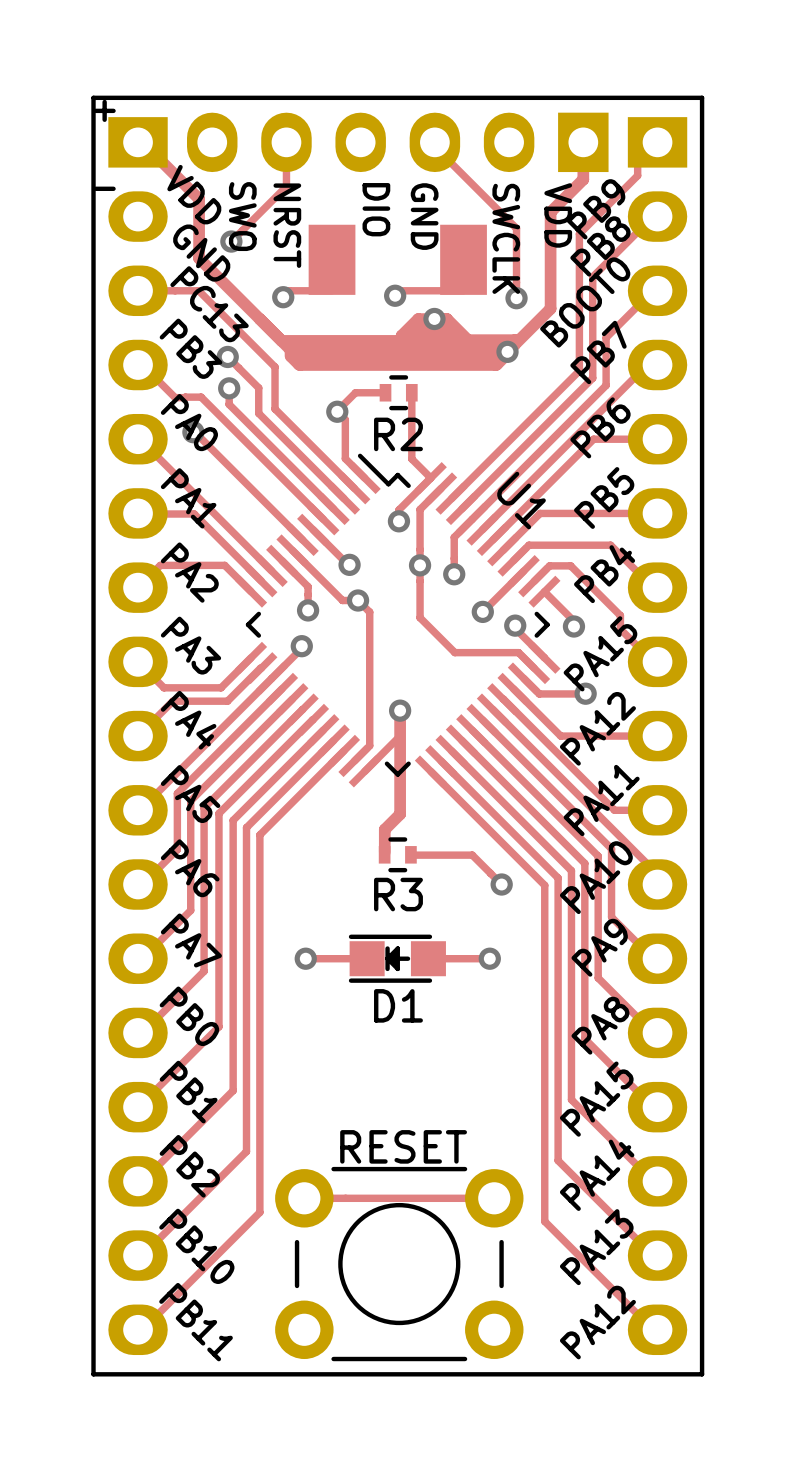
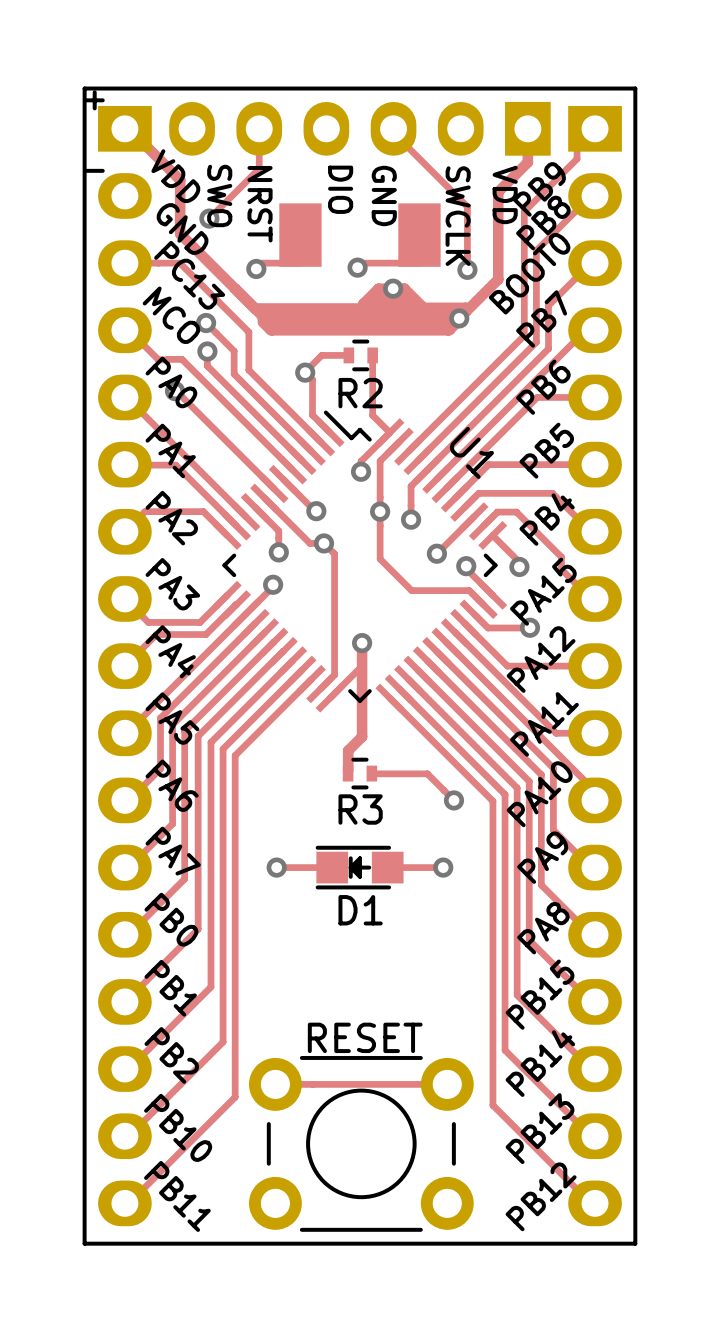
text: PB3 (190, 348) -> MCO (171, 315)
text: PA15 (596, 1099) -> PB15 (540, 994)
text: PA14 (597, 1175) -> PB14 (540, 1063)
text: PA13 (596, 1247) -> PB13 (540, 1128)
text: PA12 (597, 1322) -> PB12 (541, 1196)

